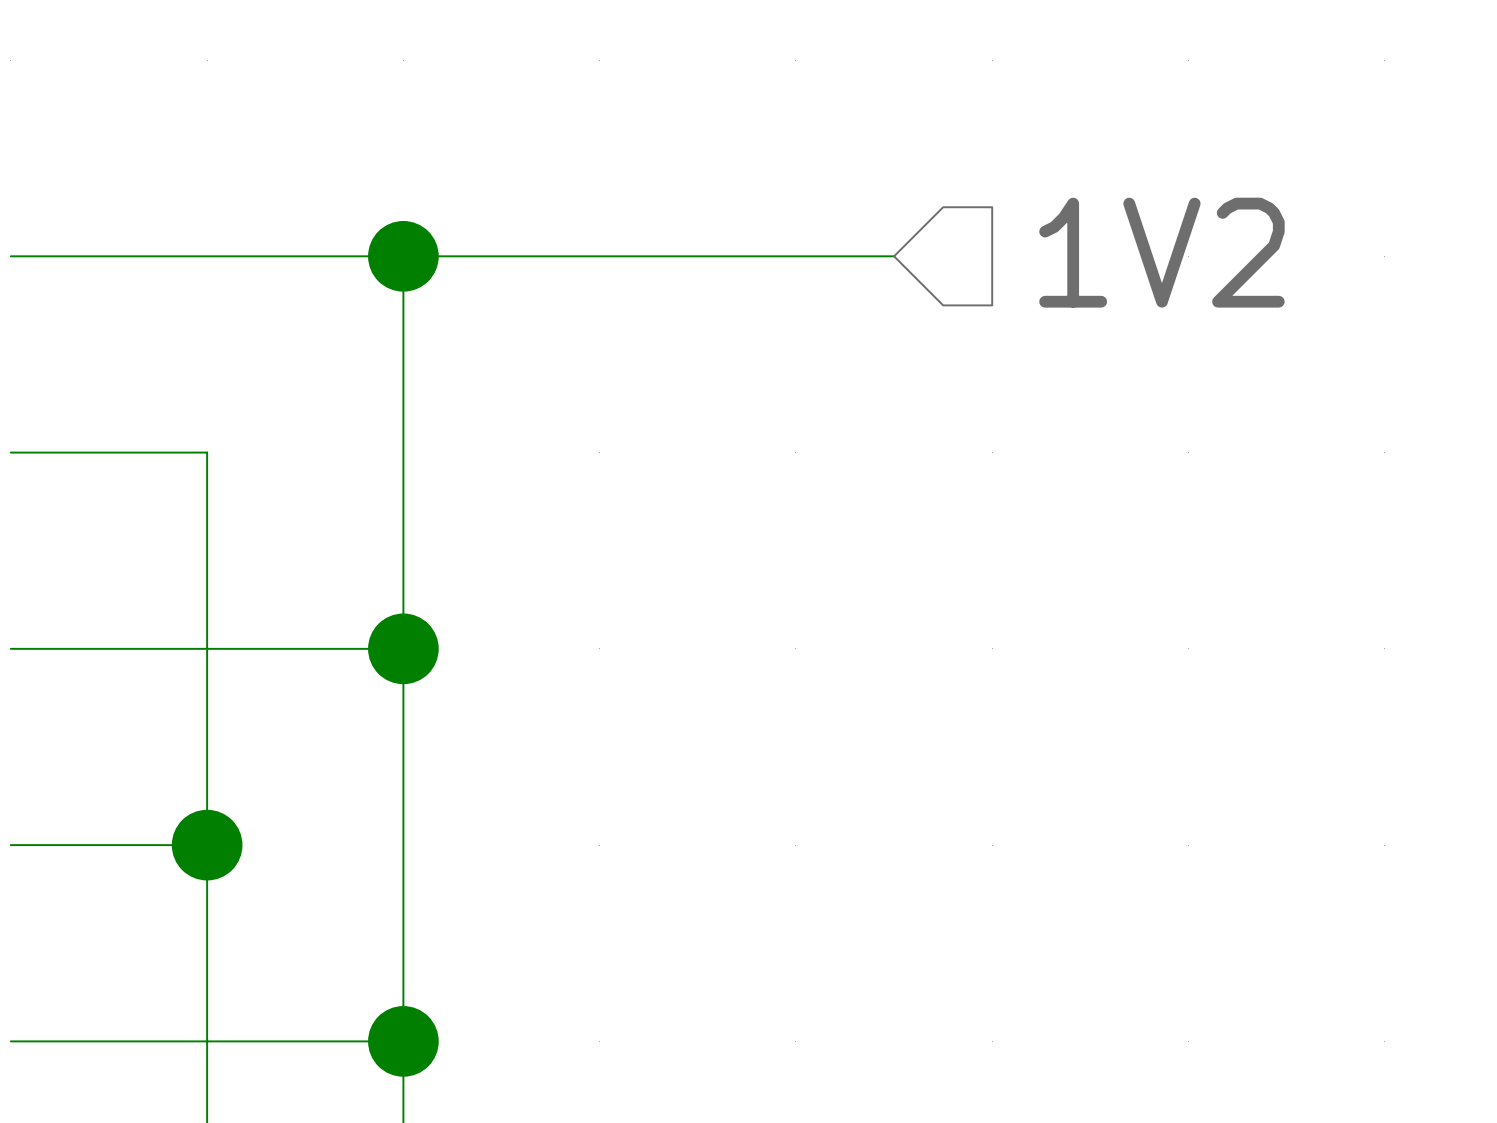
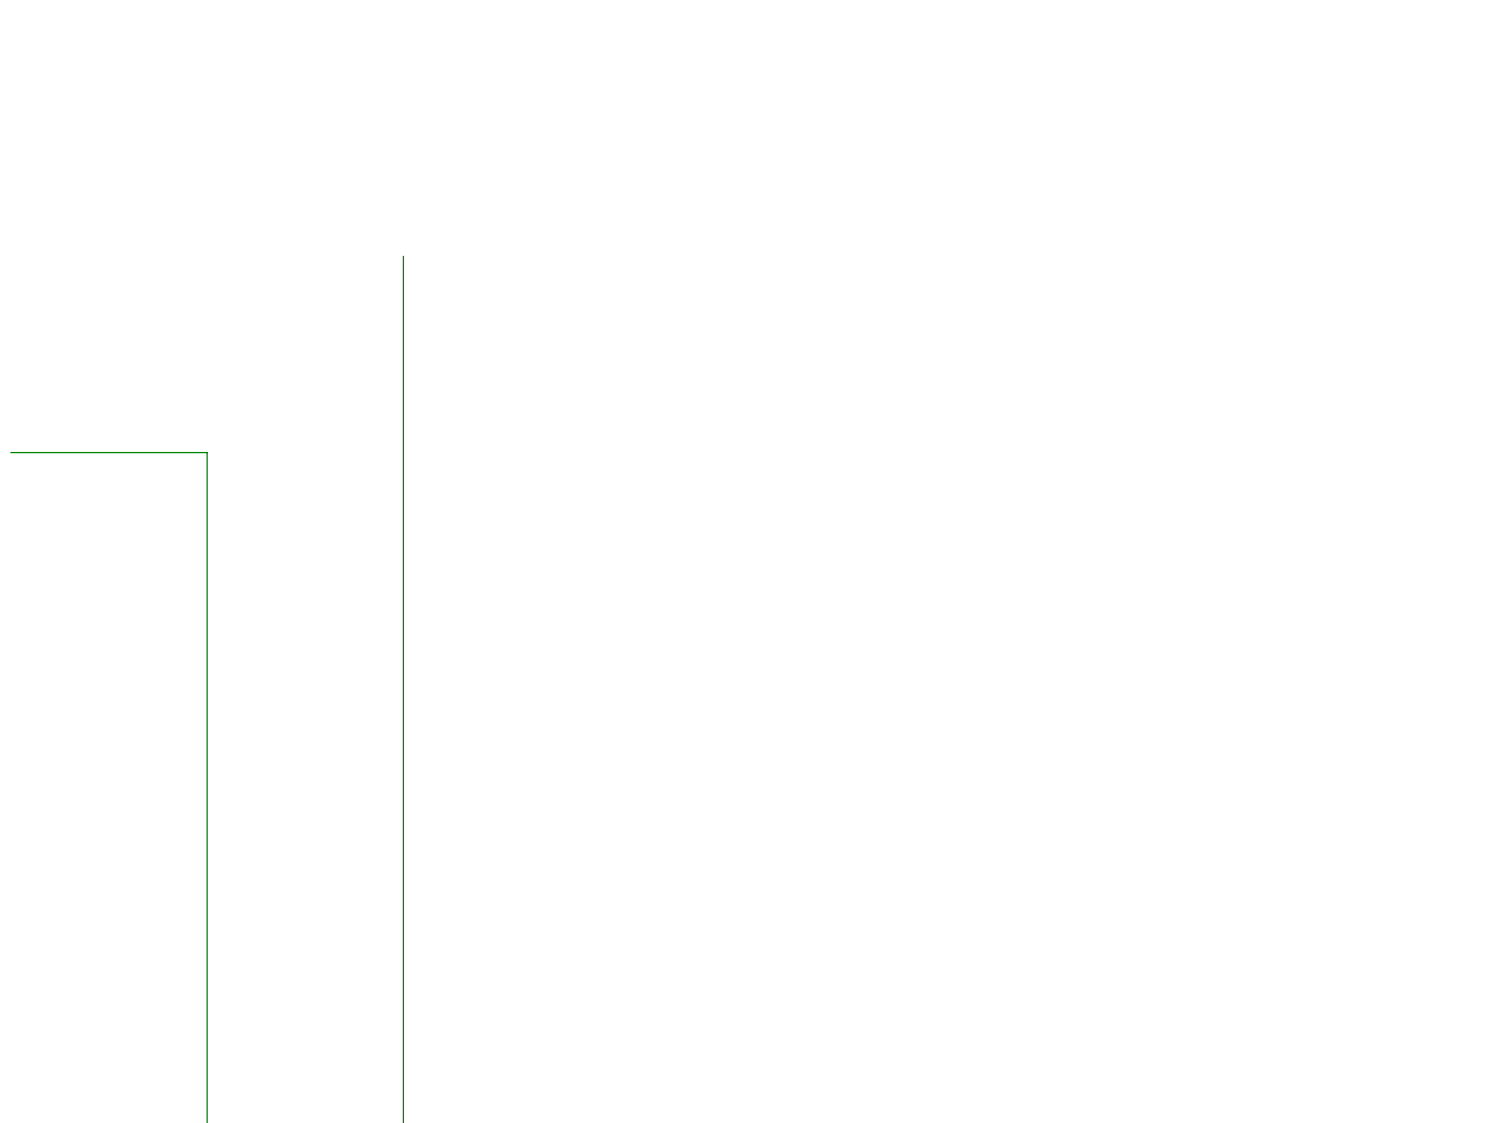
hierarchical label: 1V2 (1161, 252) -> none
wire: (10, 256) (894, 256) -> none
junction: (403, 256) -> none
wire: (10, 648) (403, 648) -> none
junction: (403, 648) -> none
wire: (10, 845) (207, 845) -> none
junction: (207, 845) -> none
wire: (10, 1041) (403, 1041) -> none
junction: (403, 1041) -> none

